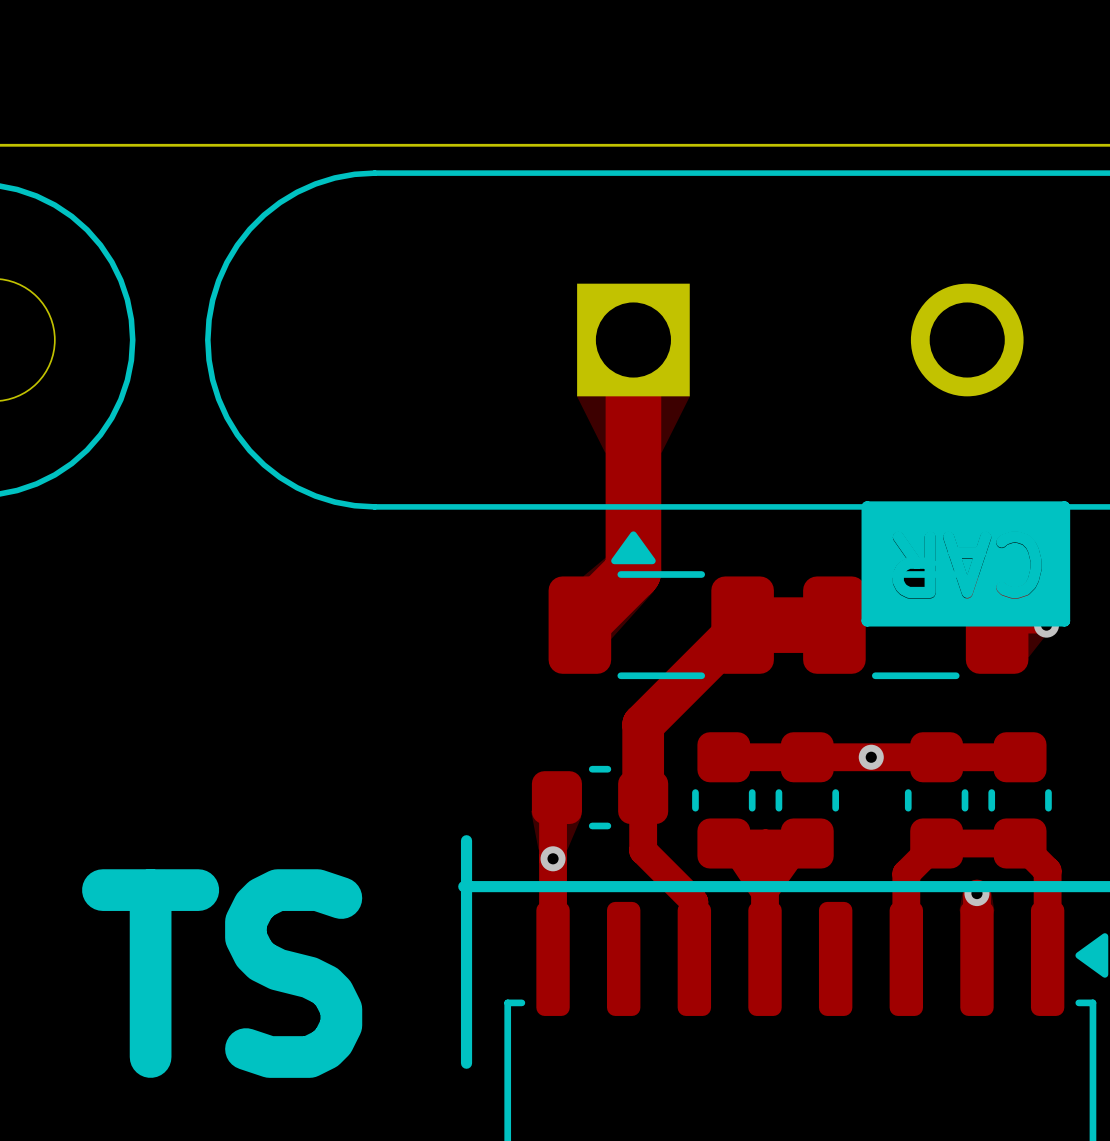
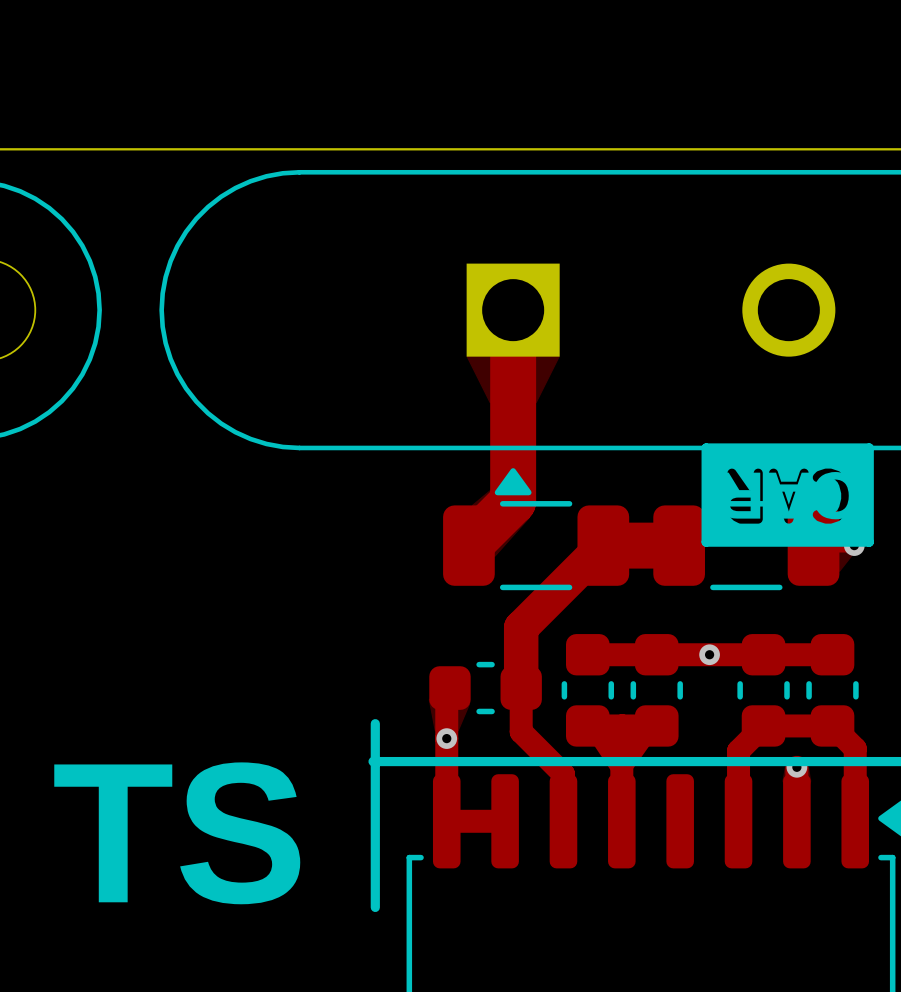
top track: none -> (446, 821) (505, 821)

